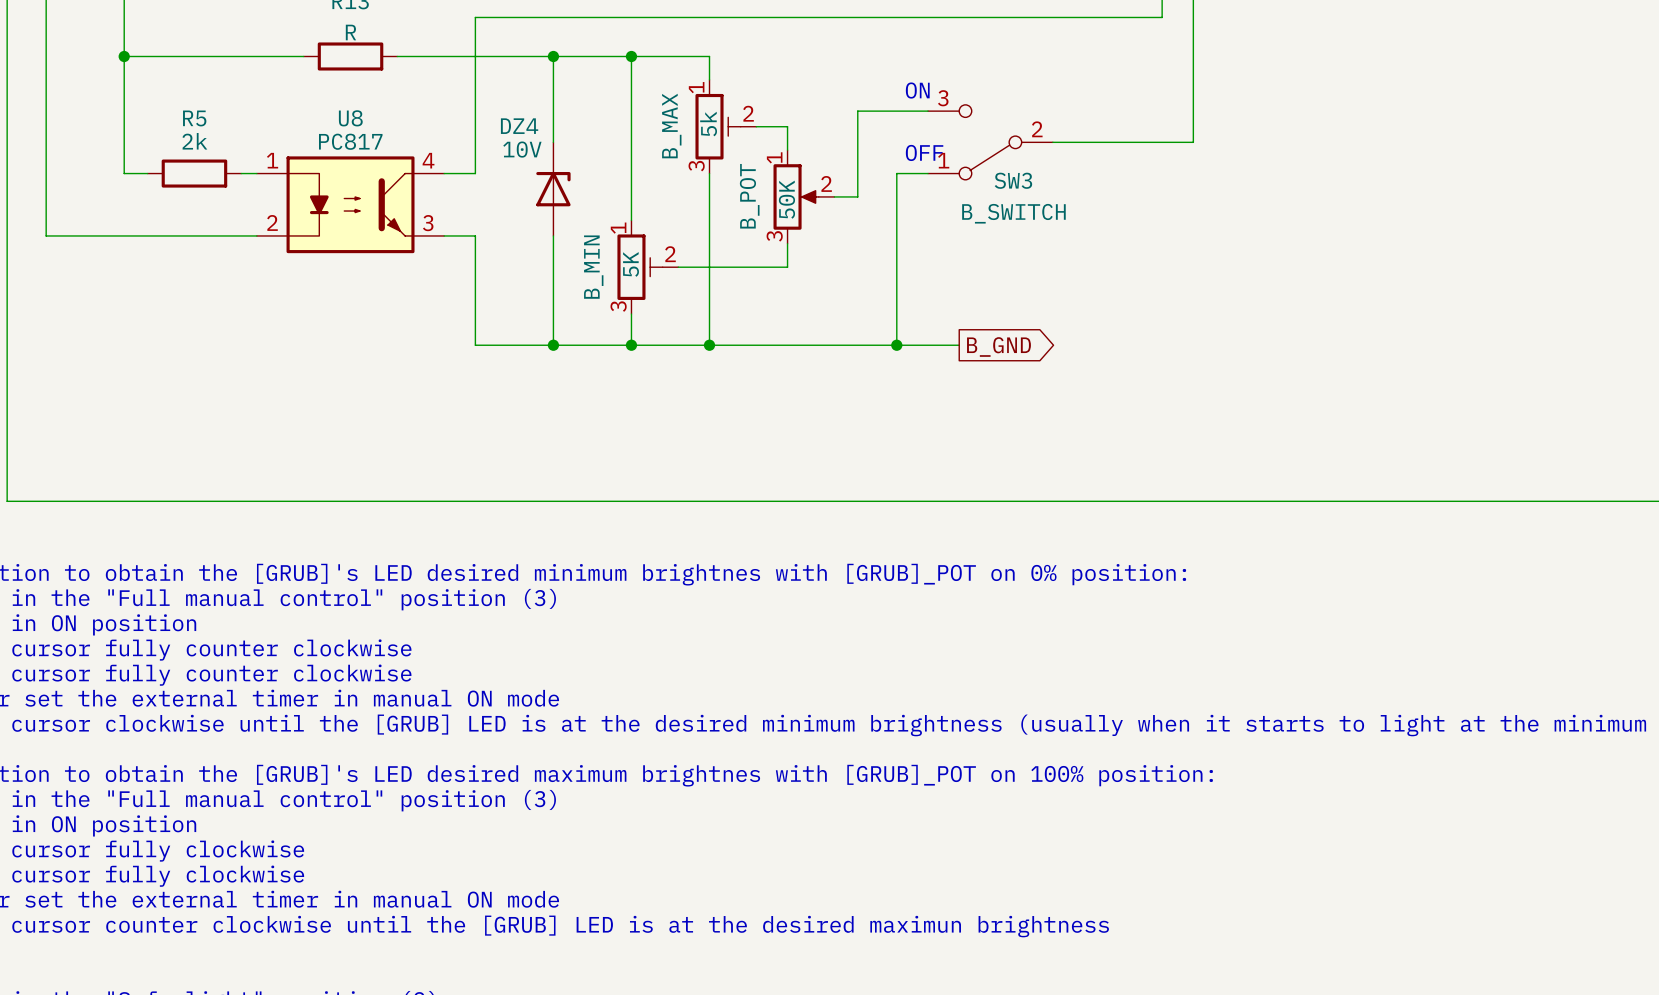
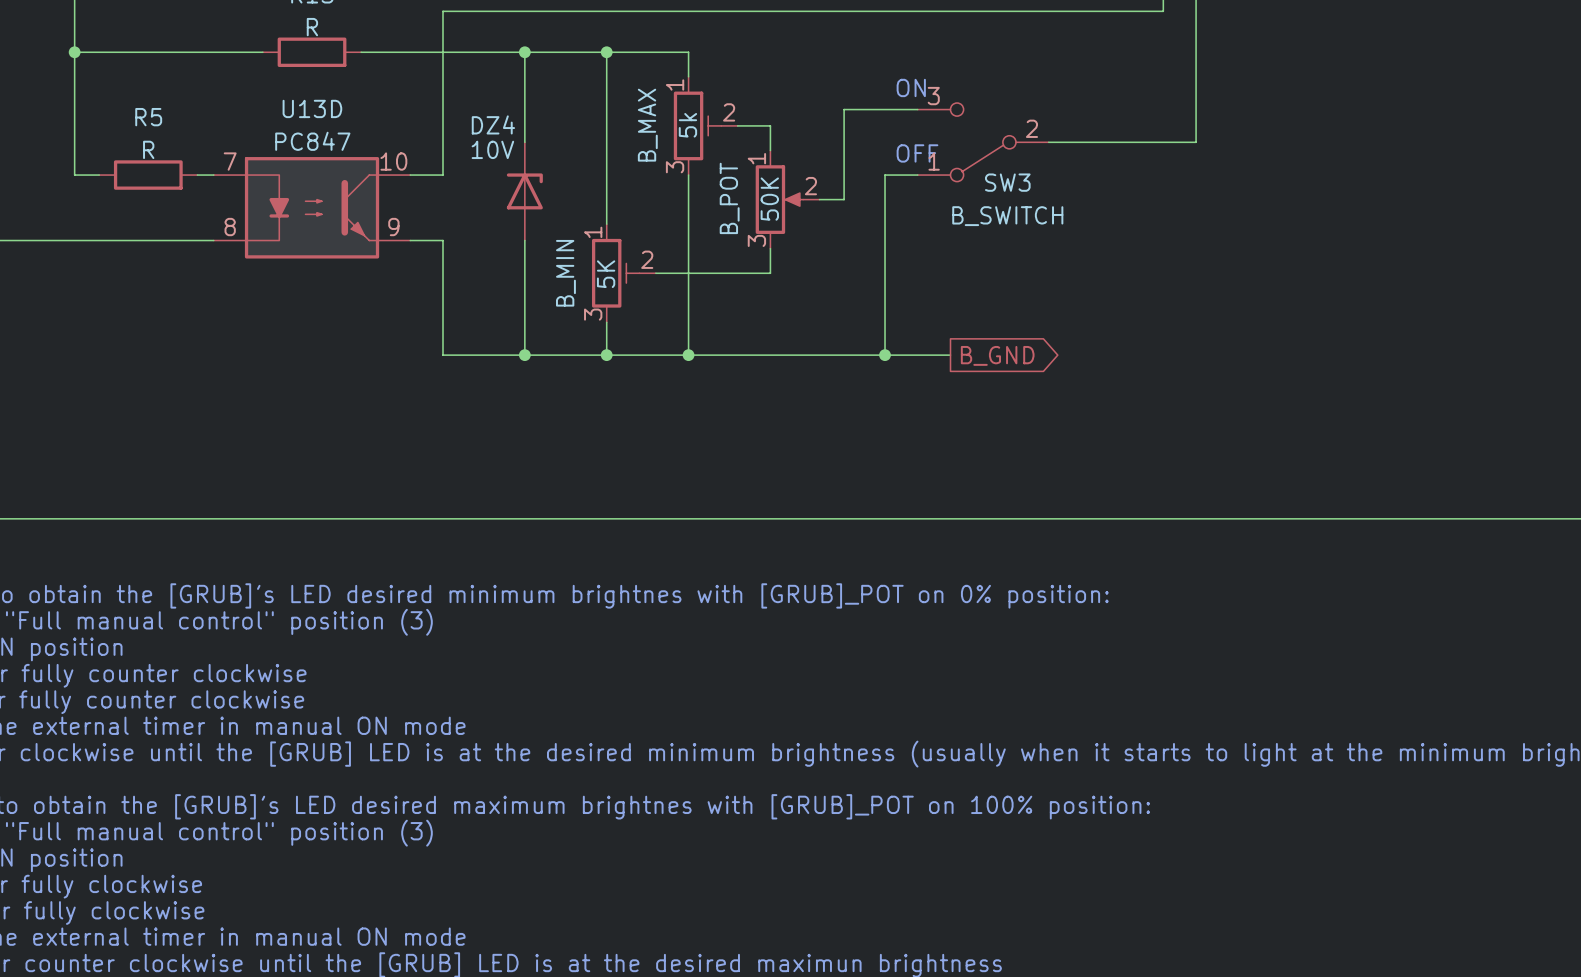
U8 name: U8 (350, 118) -> U13D (312, 108)
R5 value: 2k (194, 141) -> R (148, 149)
U8 value: PC817 (350, 141) -> PC847 (312, 141)
U8 pin number: 1 (272, 160) -> 7 (230, 161)
U8 pin number: 4 (428, 160) -> 10 (393, 161)
U8 pin number: 2 (272, 222) -> 8 (230, 227)
U8 pin number: 3 (428, 223) -> 9 (393, 227)

